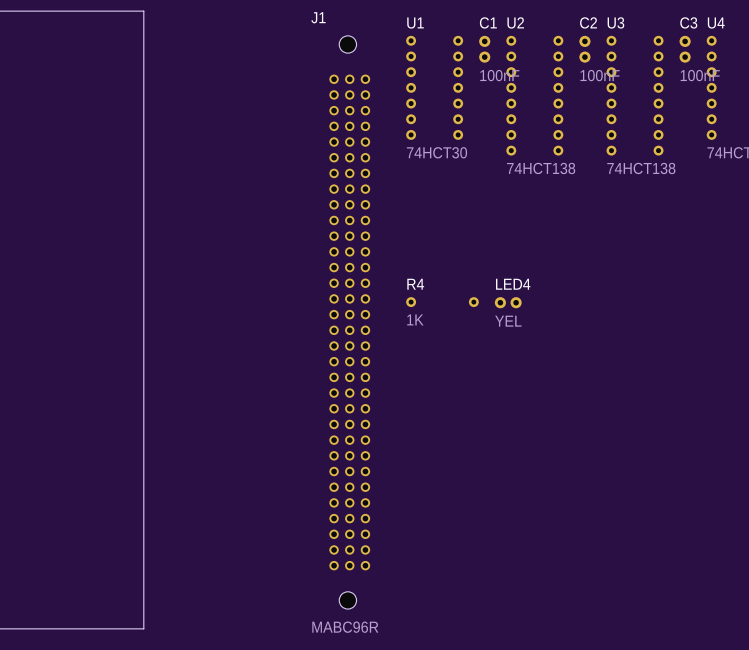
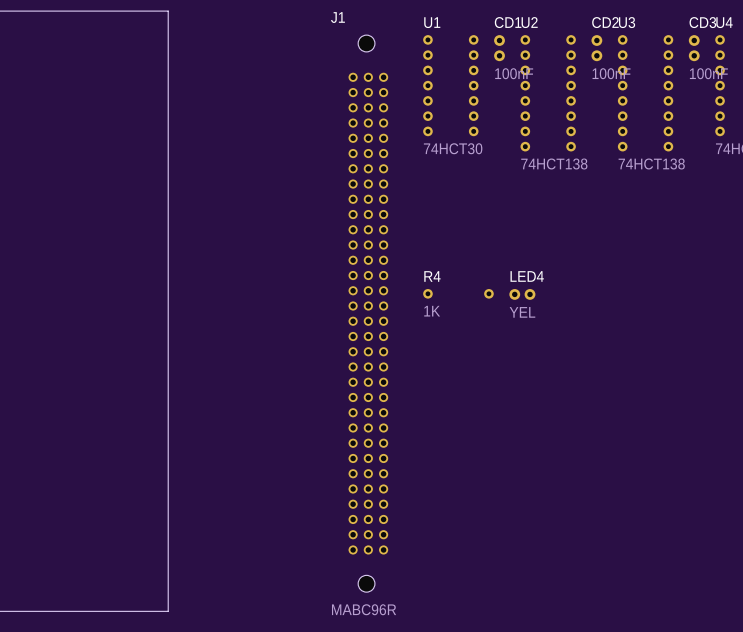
C1 name: C1 (488, 22) -> CD1 (508, 22)
C2 name: C2 (588, 22) -> CD2 (605, 22)
C3 name: C3 (688, 22) -> CD3 (702, 22)

